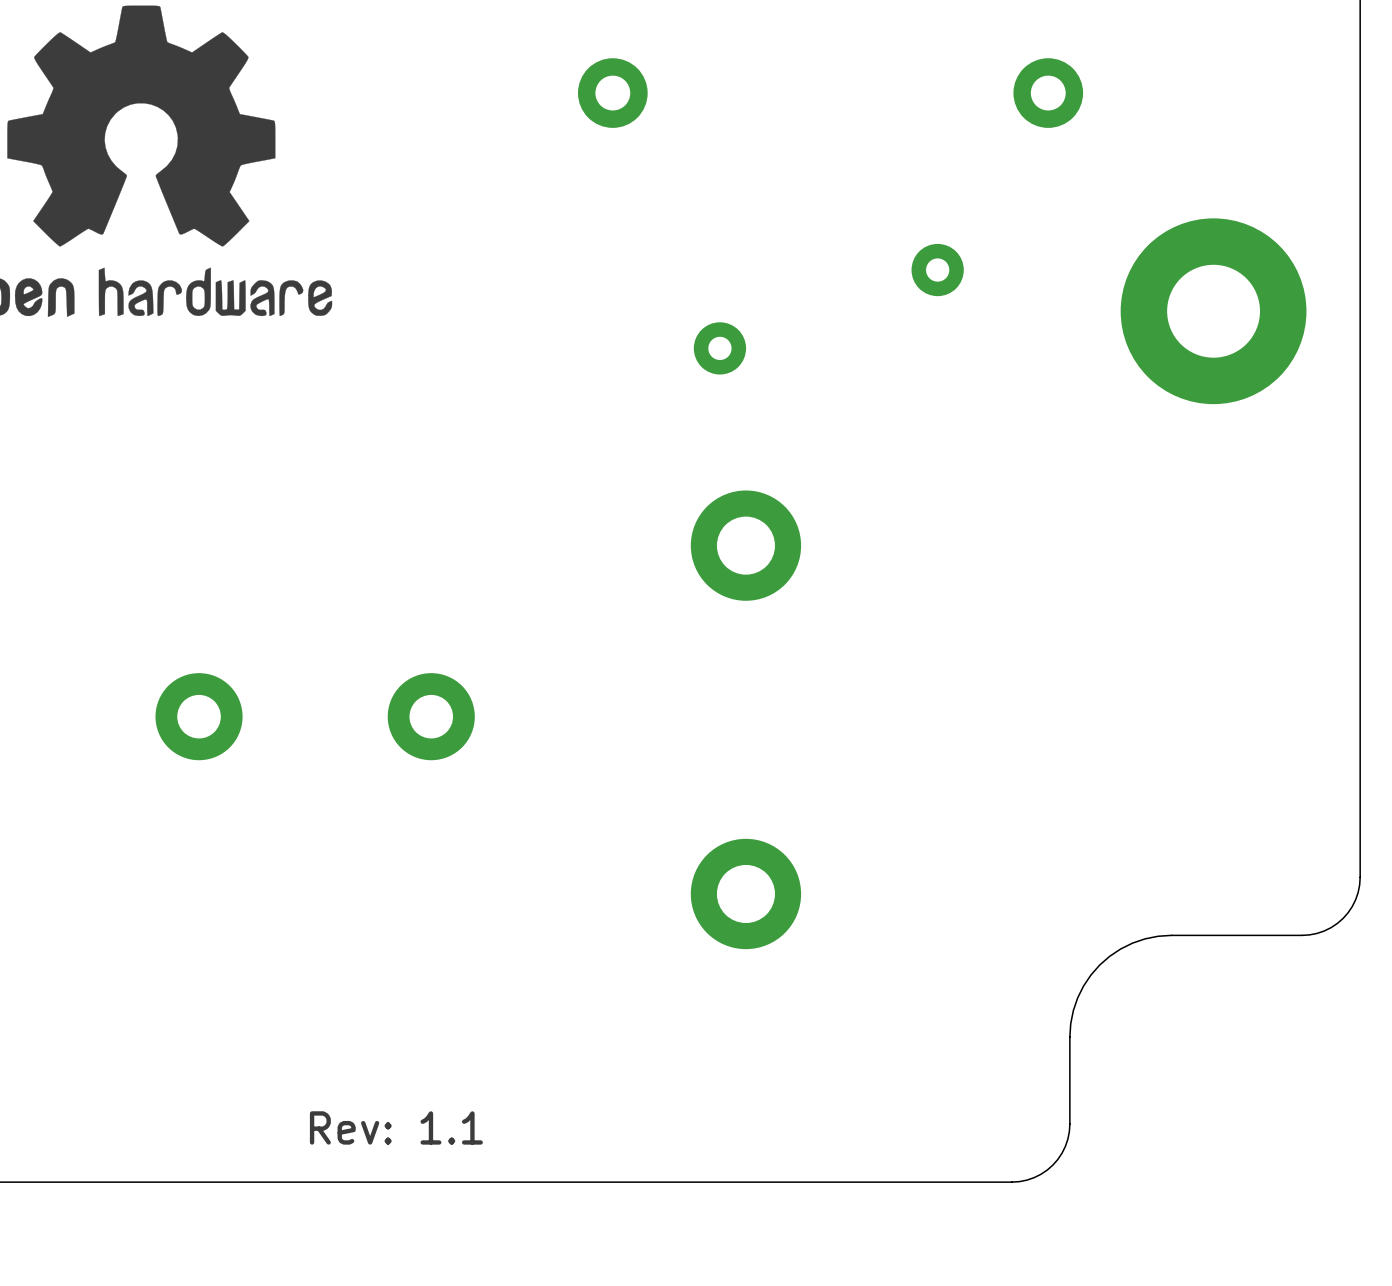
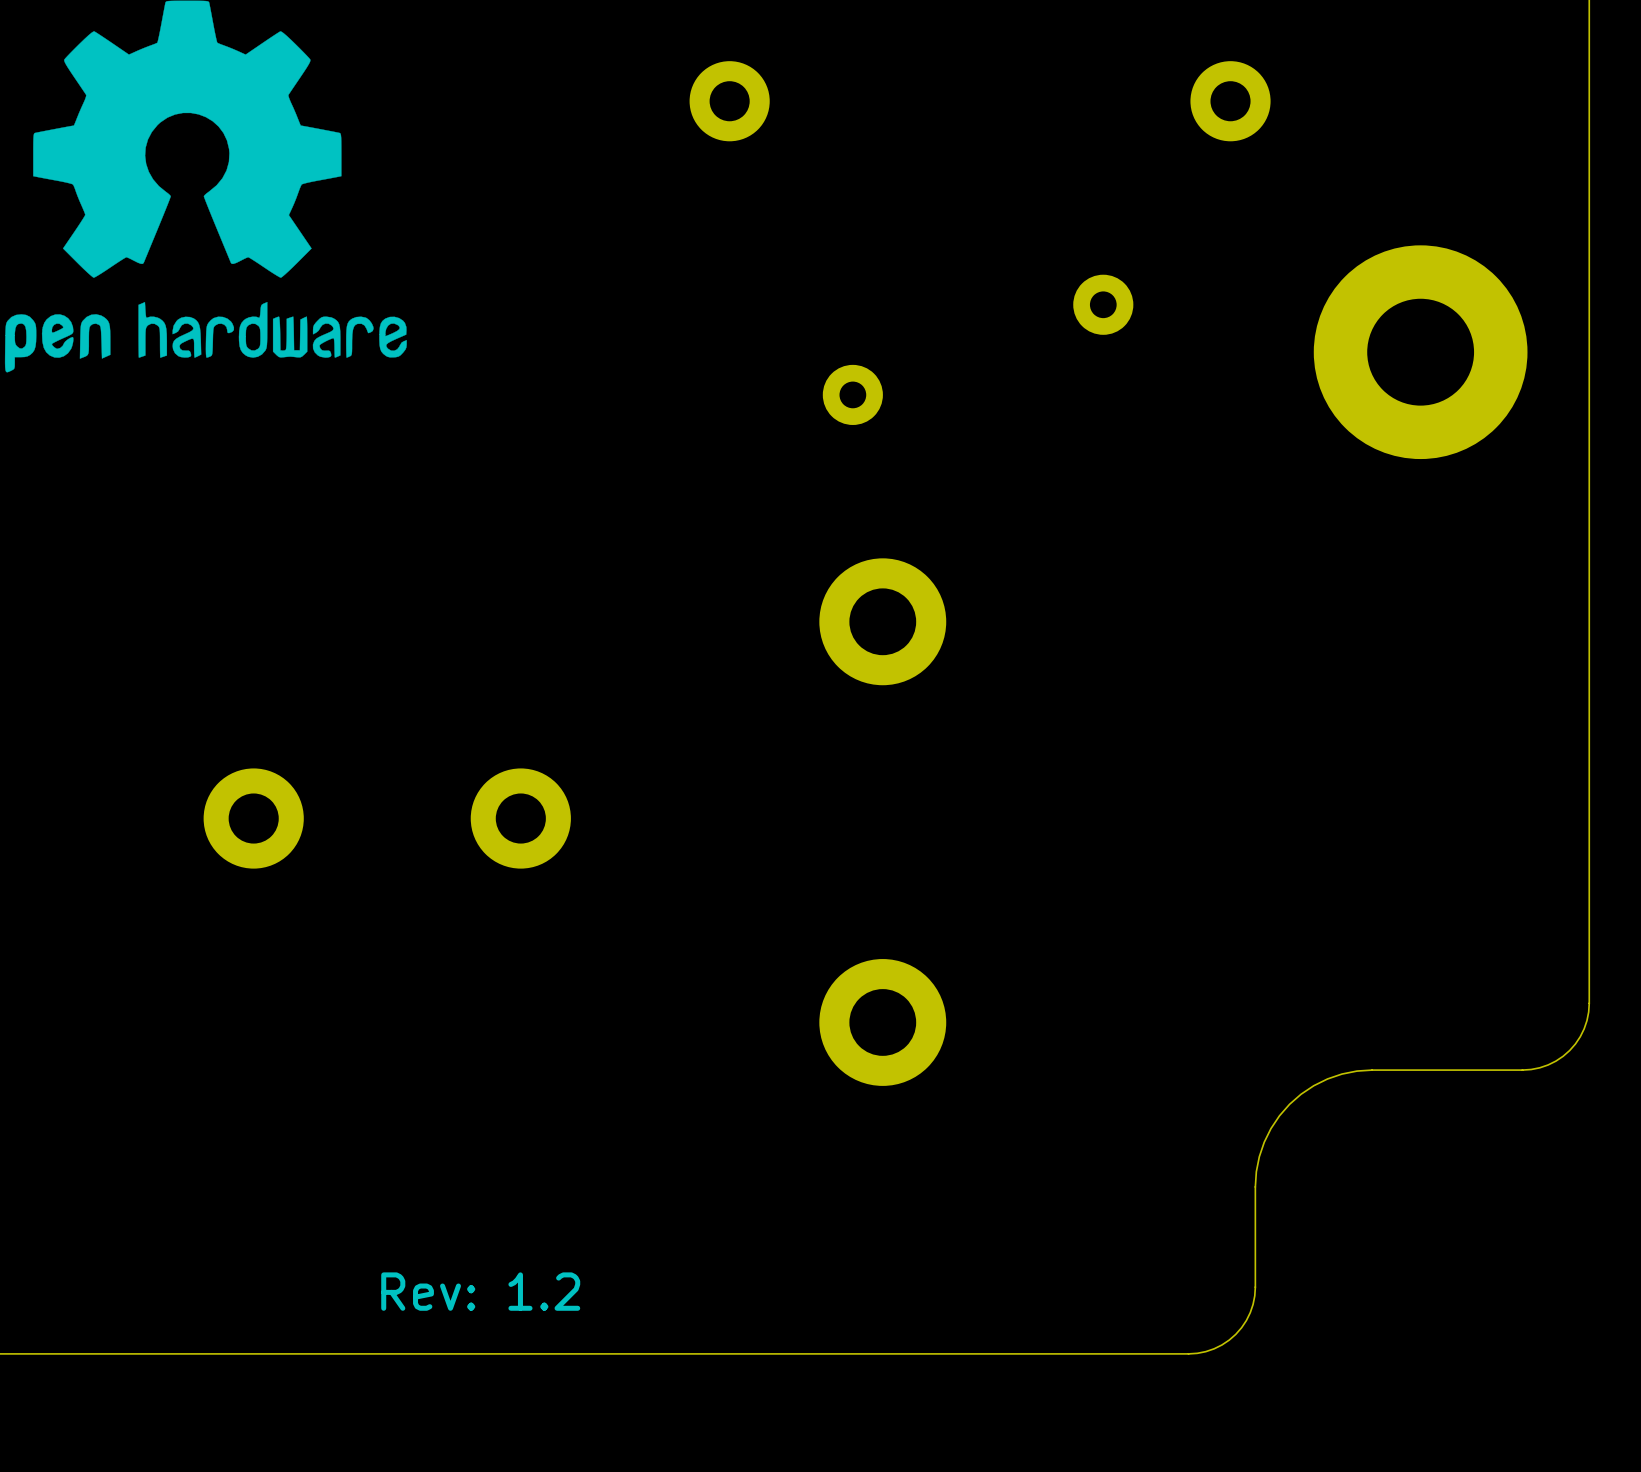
text: Rev: 1.1 (396, 1127) -> Rev: 1.2 (480, 1291)

